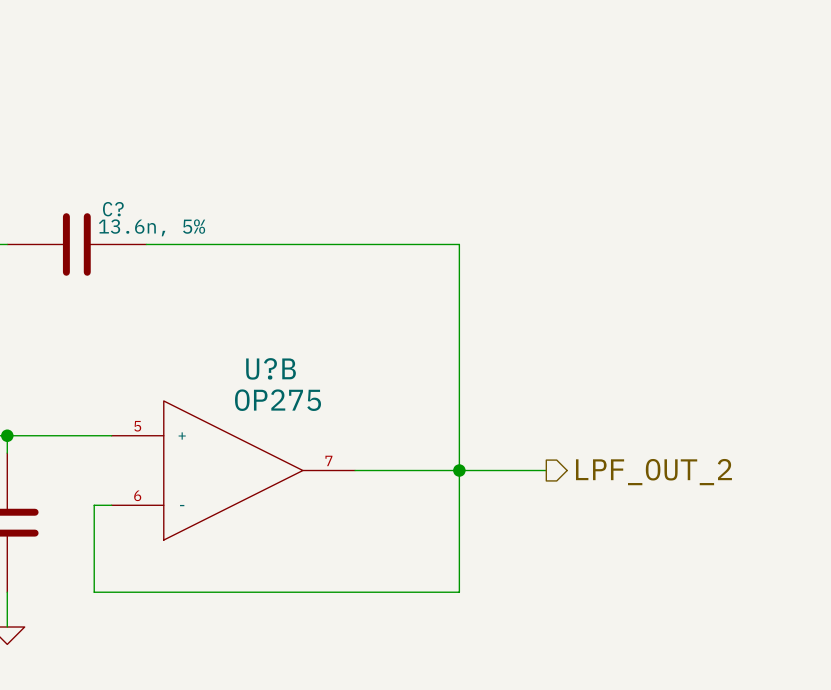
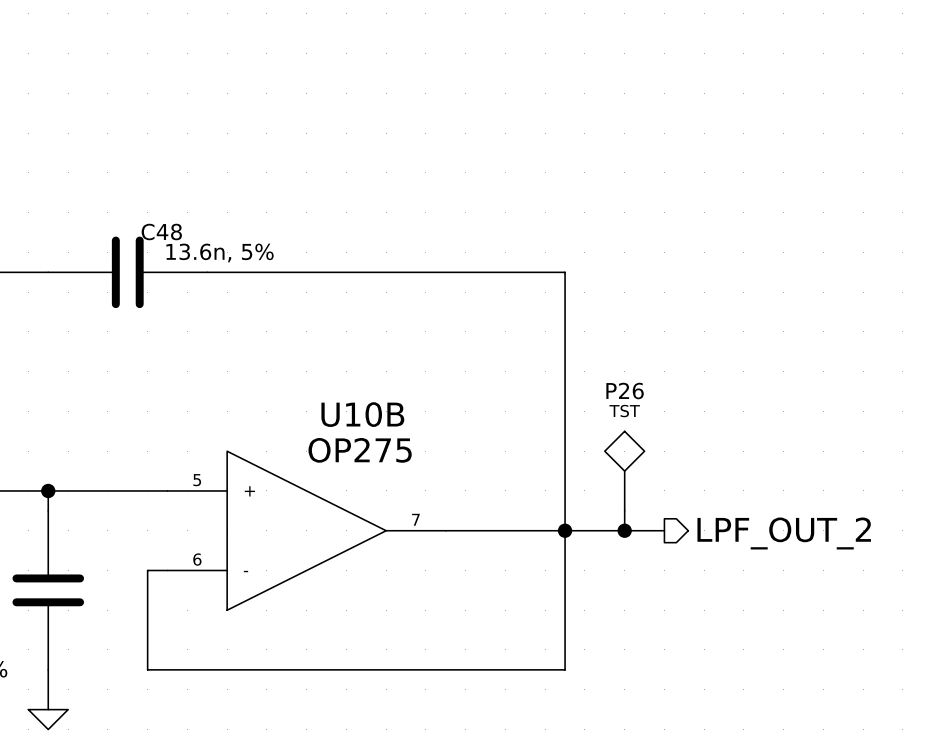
C? name: C? (113, 209) -> C48 (161, 232)
U?B name: U?B (271, 368) -> U10B (362, 414)
P26: none -> TST (624, 471)
wire: none -> (624, 510) (624, 530)
junction: none -> (624, 530)

